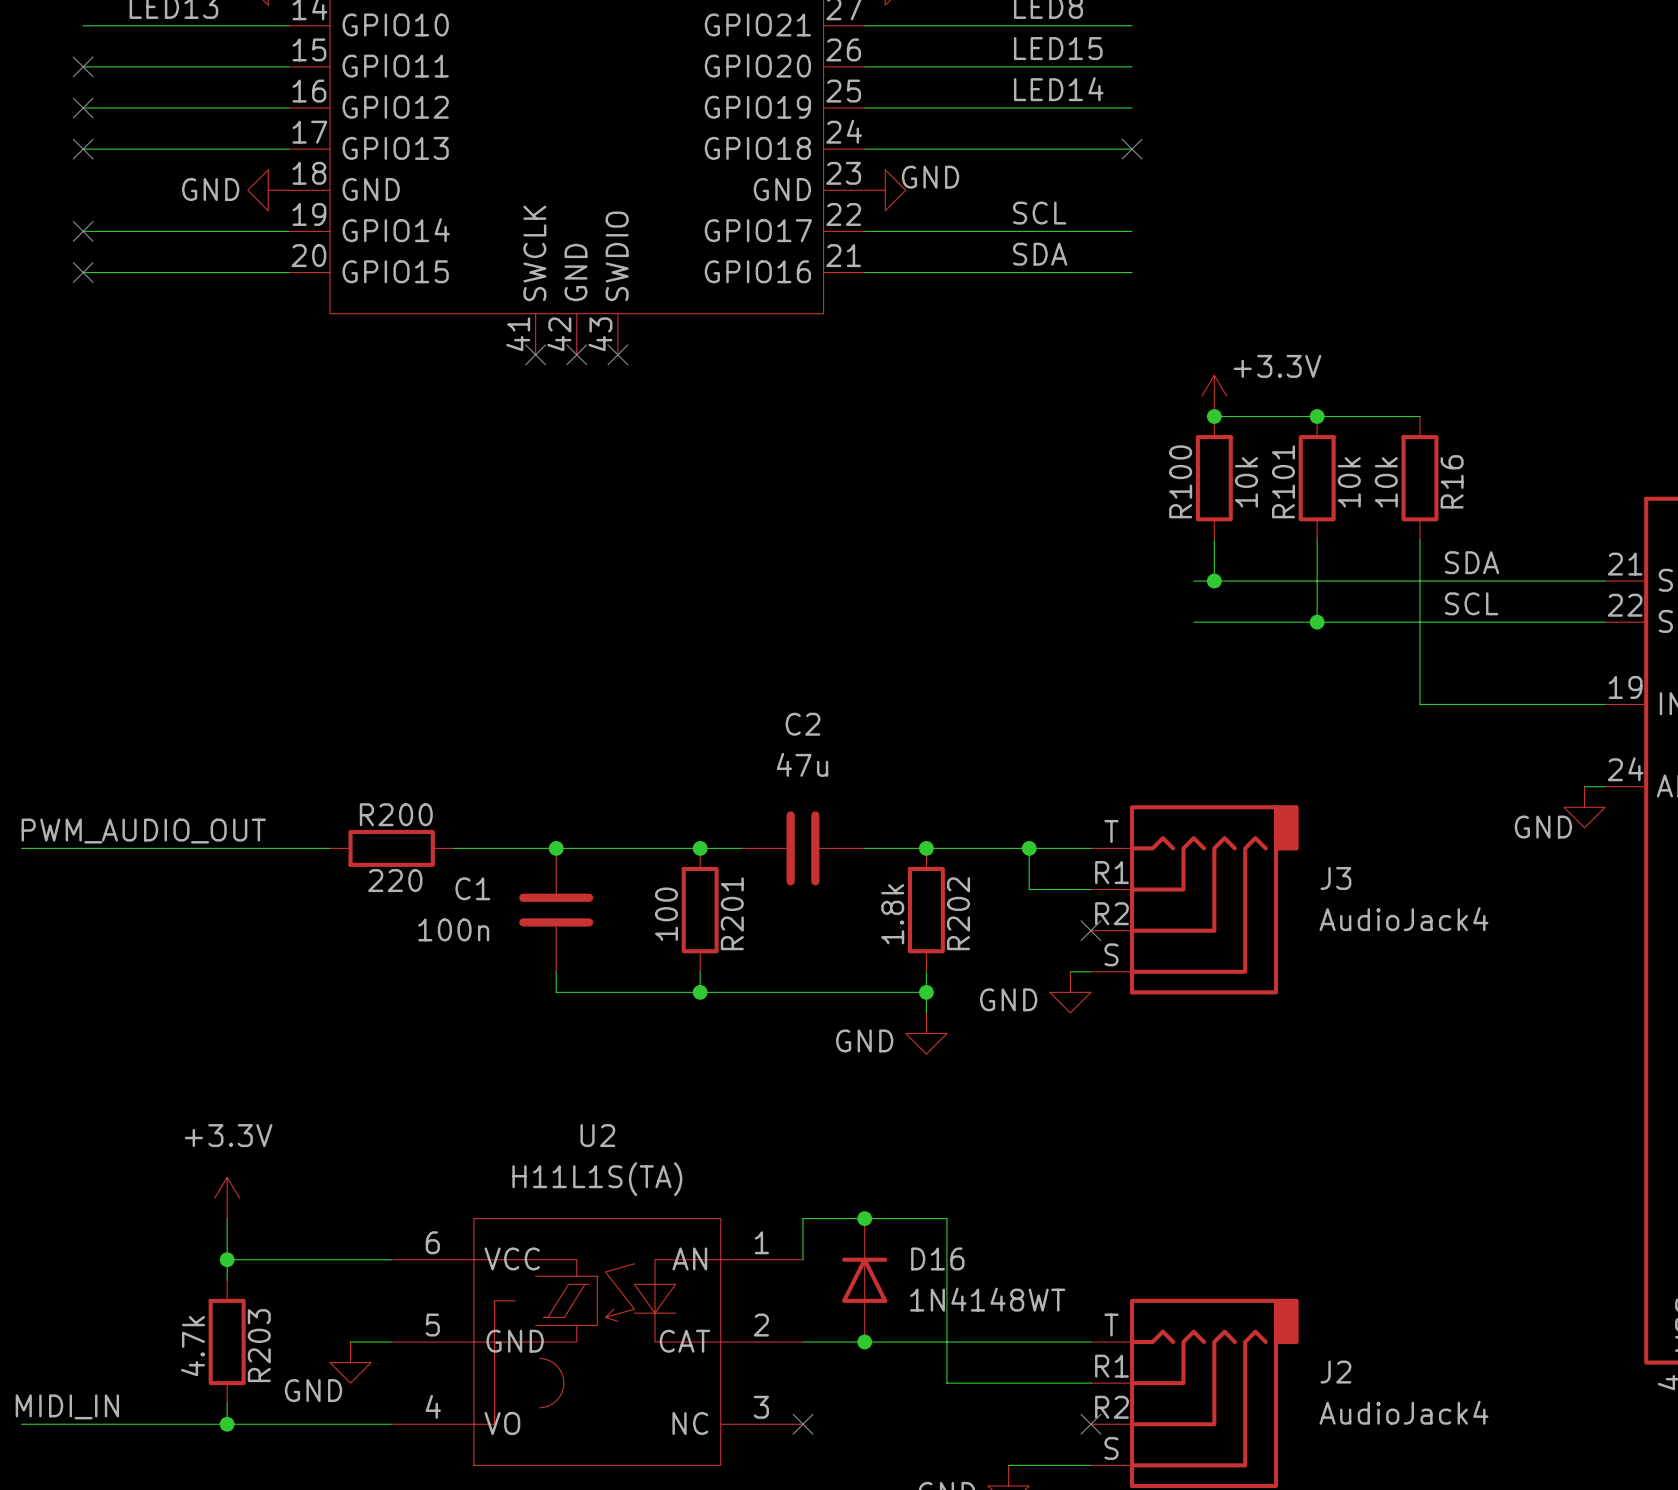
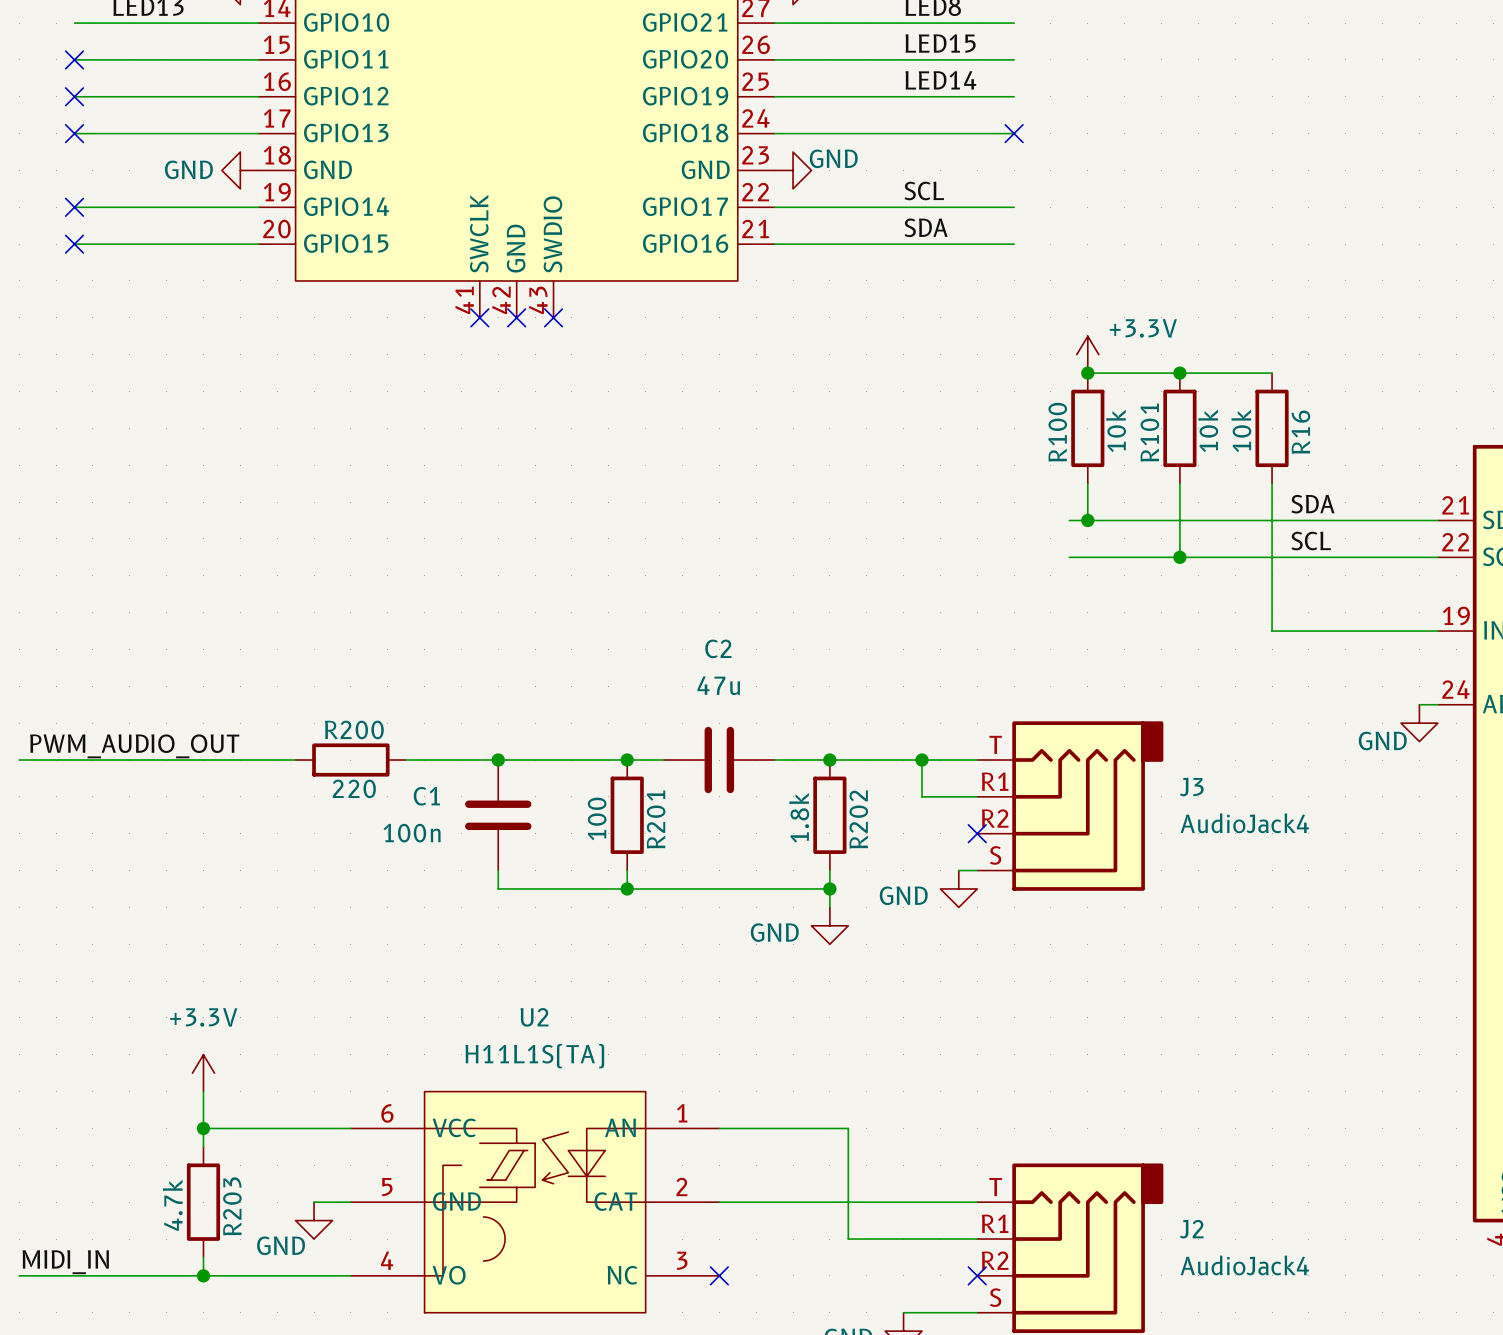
junction: (864, 1218) -> none
wire: (803, 1259) (803, 1218) (946, 1218) (946, 1259) -> (719, 1128) (848, 1128)
D16: 1N4148WT (864, 1280) -> none
junction: (864, 1341) -> none

